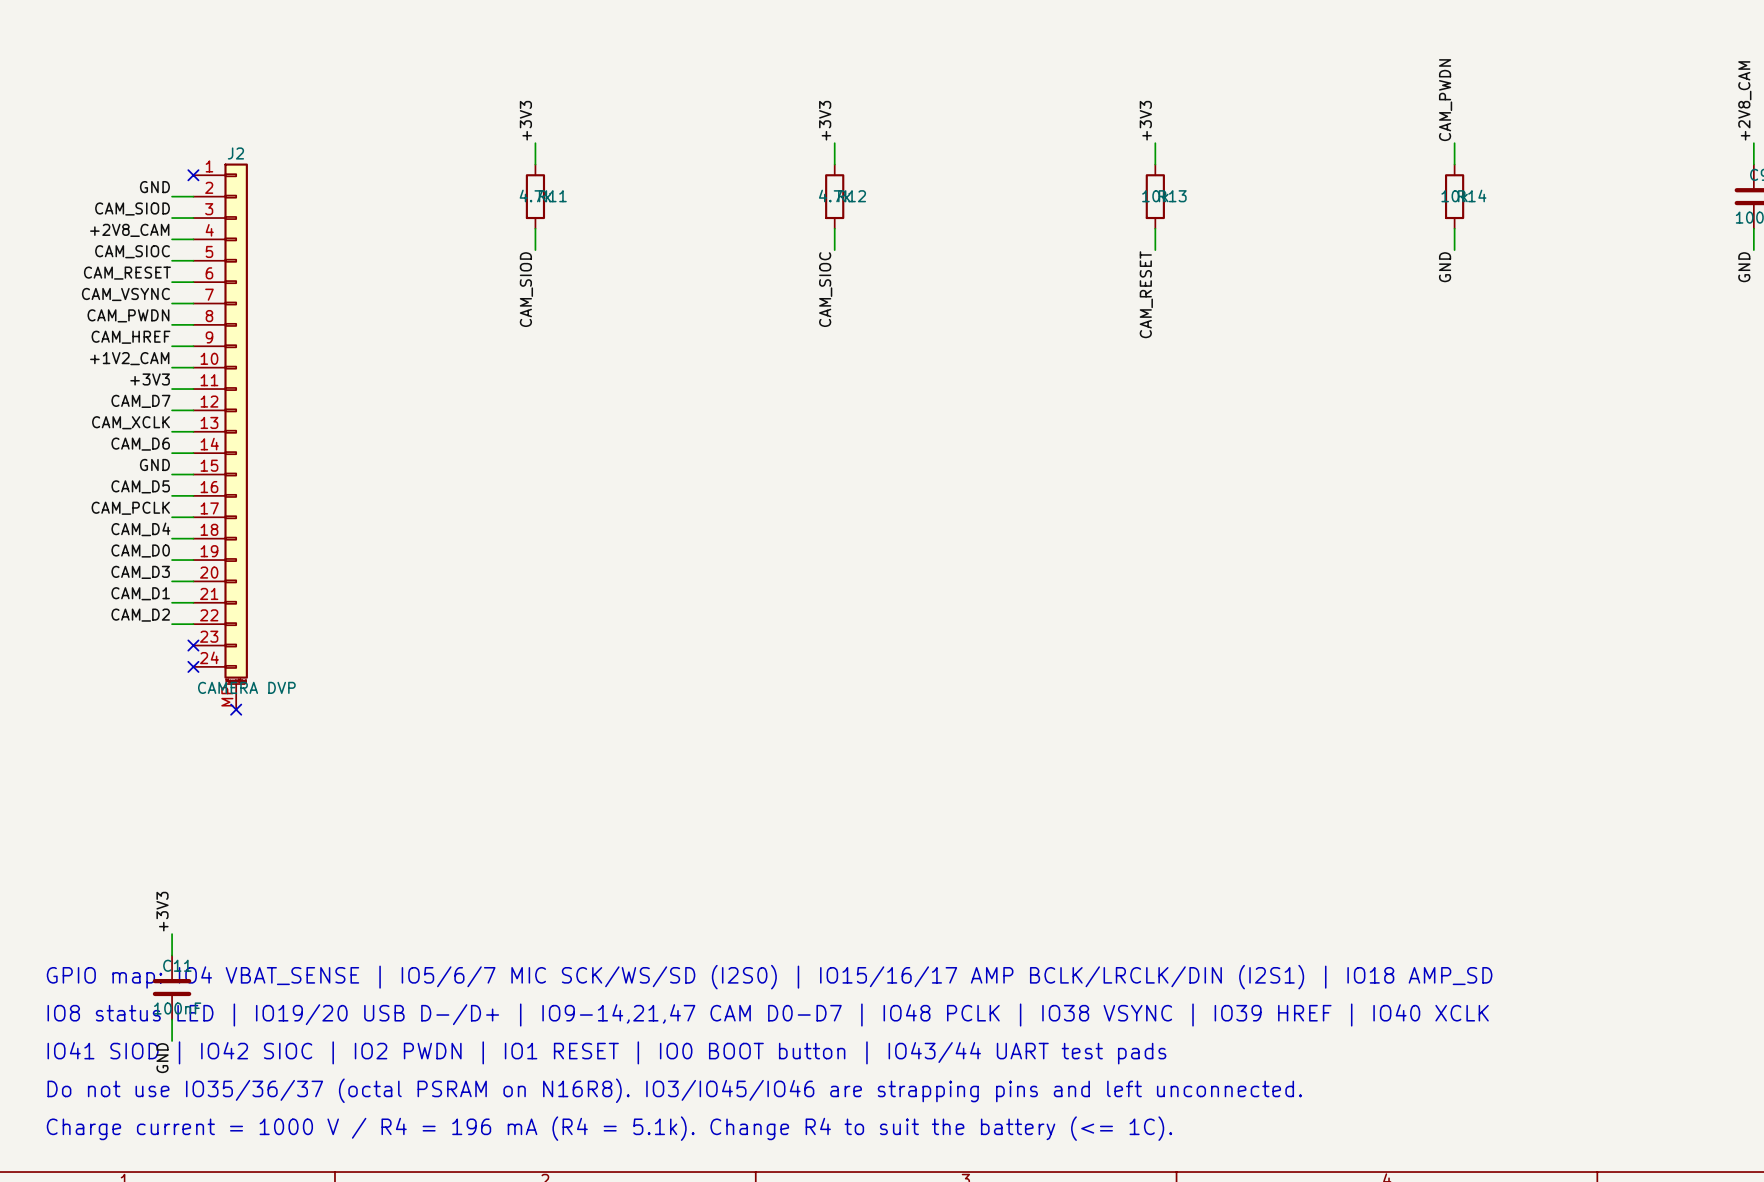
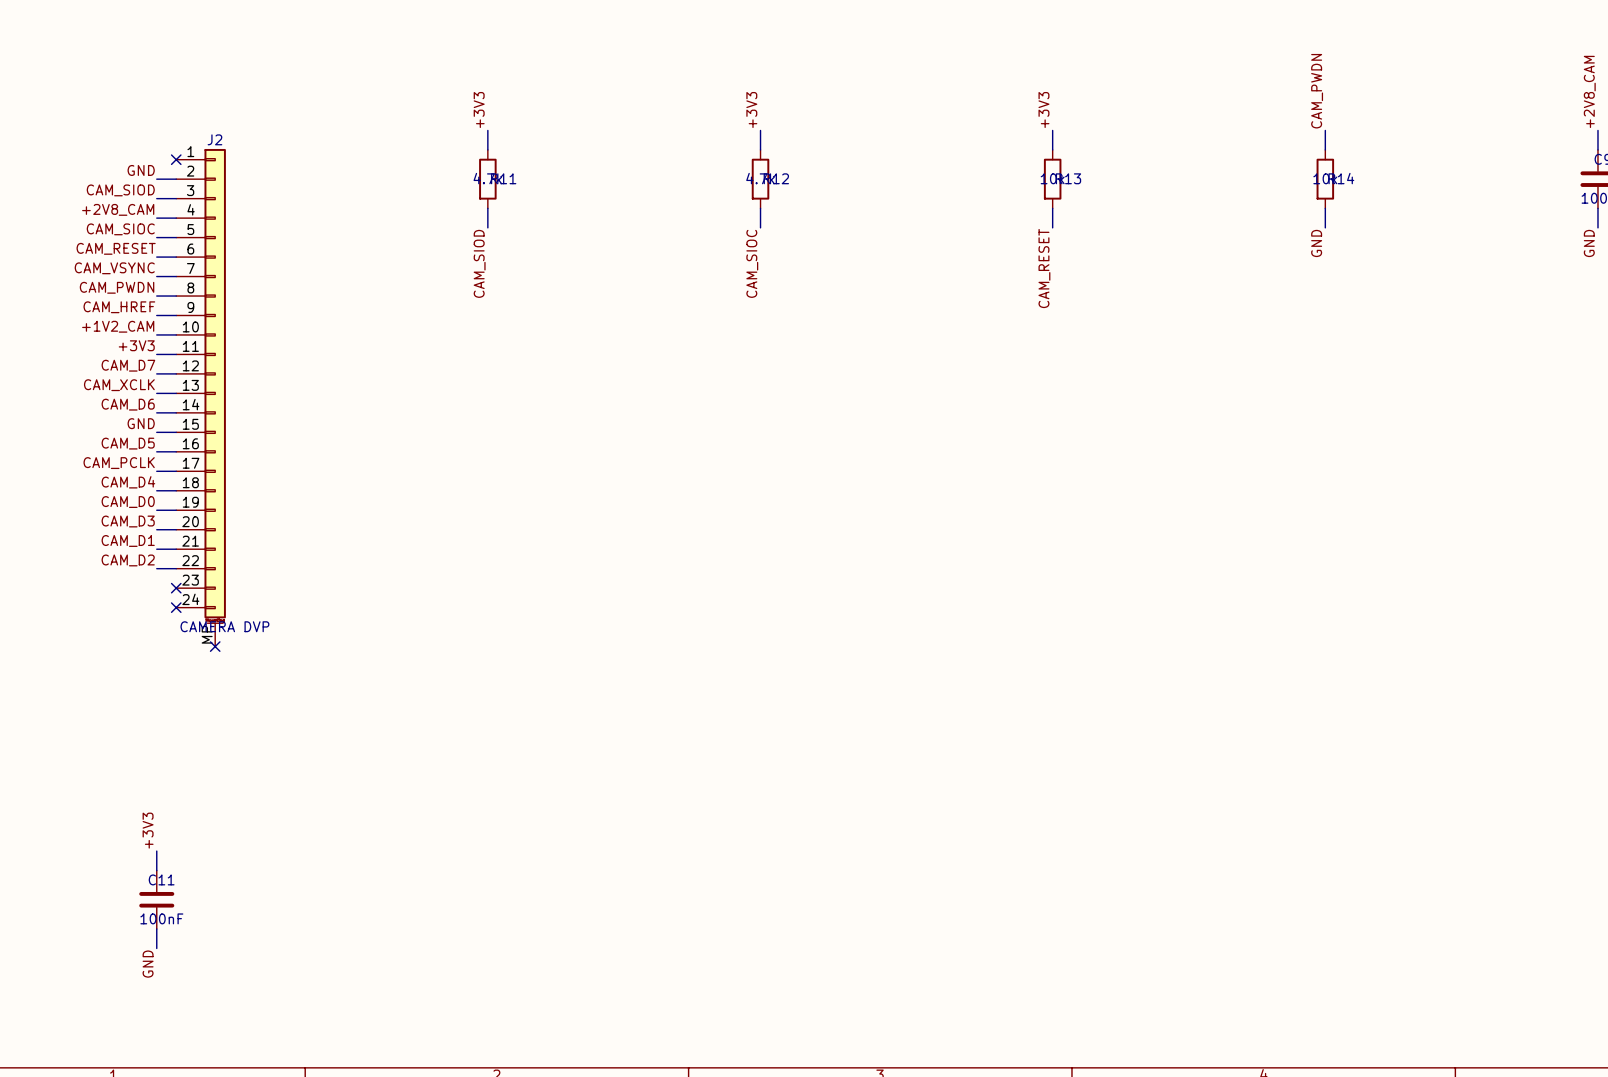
text: GPIO map: IO4 VBAT_SENSE | IO5/6/7 MIC SCK/WS/SD (I2S0) | IO15/16/17 AMP BCLK/LRCLK/DIN (I2S1) | IO18 AMP_SD (769, 977) -> none
text: IO8 status LED | IO19/20 USB D-/D+ | IO9-14,21,47 CAM D0-D7 | IO48 PCLK | IO38 VSYNC | IO39 HREF | IO40 XCLK (768, 1015) -> none
text: IO41 SIOD | IO42 SIOC | IO2 PWDN | IO1 RESET | IO0 BOOT button | IO43/44 UART test pads (606, 1052) -> none
text: Do not use IO35/36/37 (octal PSRAM on N16R8). IO3/IO45/IO46 are strapping pins and left unconnected. (674, 1090) -> none
text: Charge current = 1000 V / R4 = 196 mA (R4 = 5.1k). Change R4 to suit the battery (<= 1C). (609, 1128) -> none

